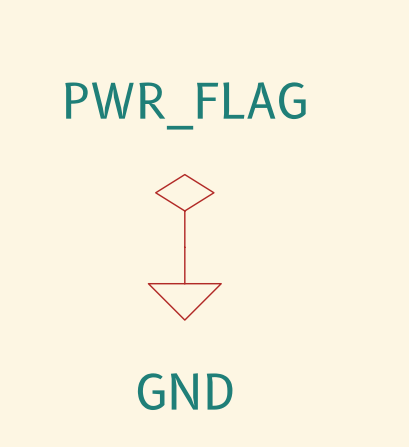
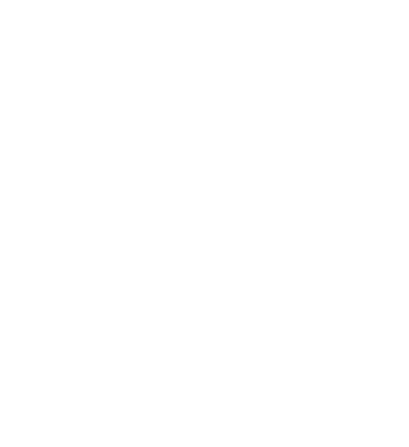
power symbol: PWR_FLAG (184, 210) -> none
power symbol: GND (184, 283) -> none

